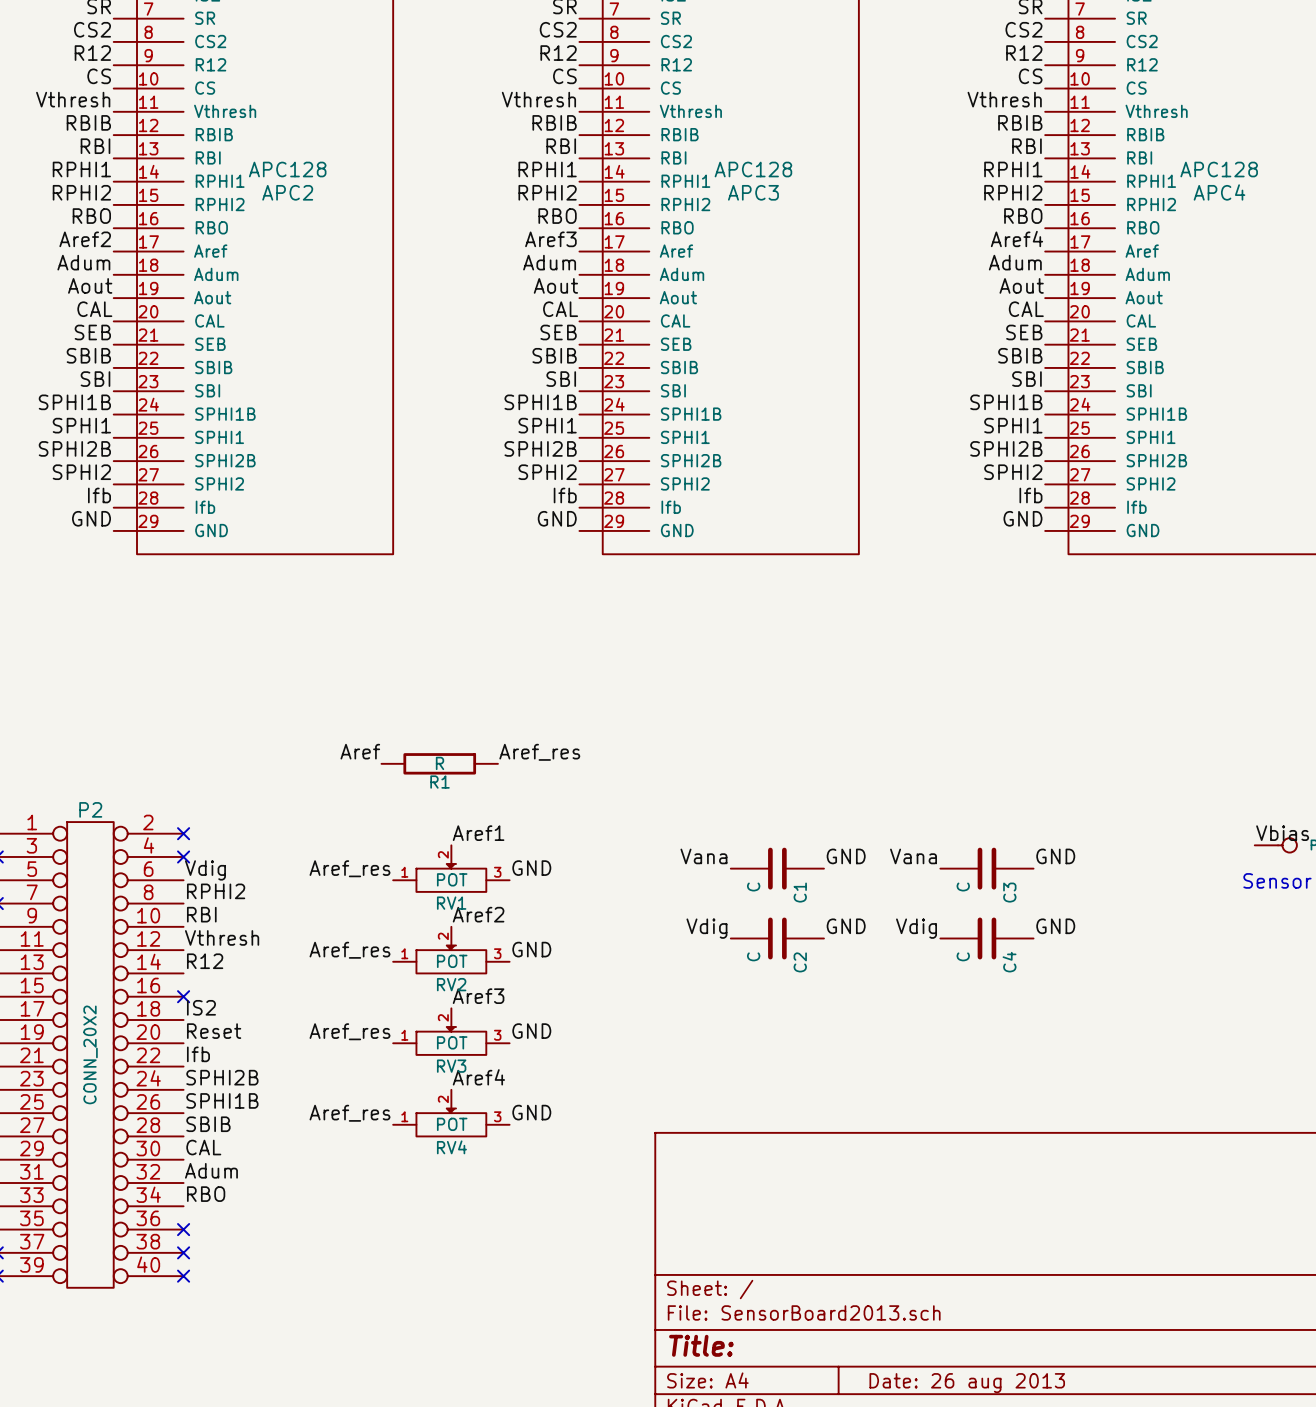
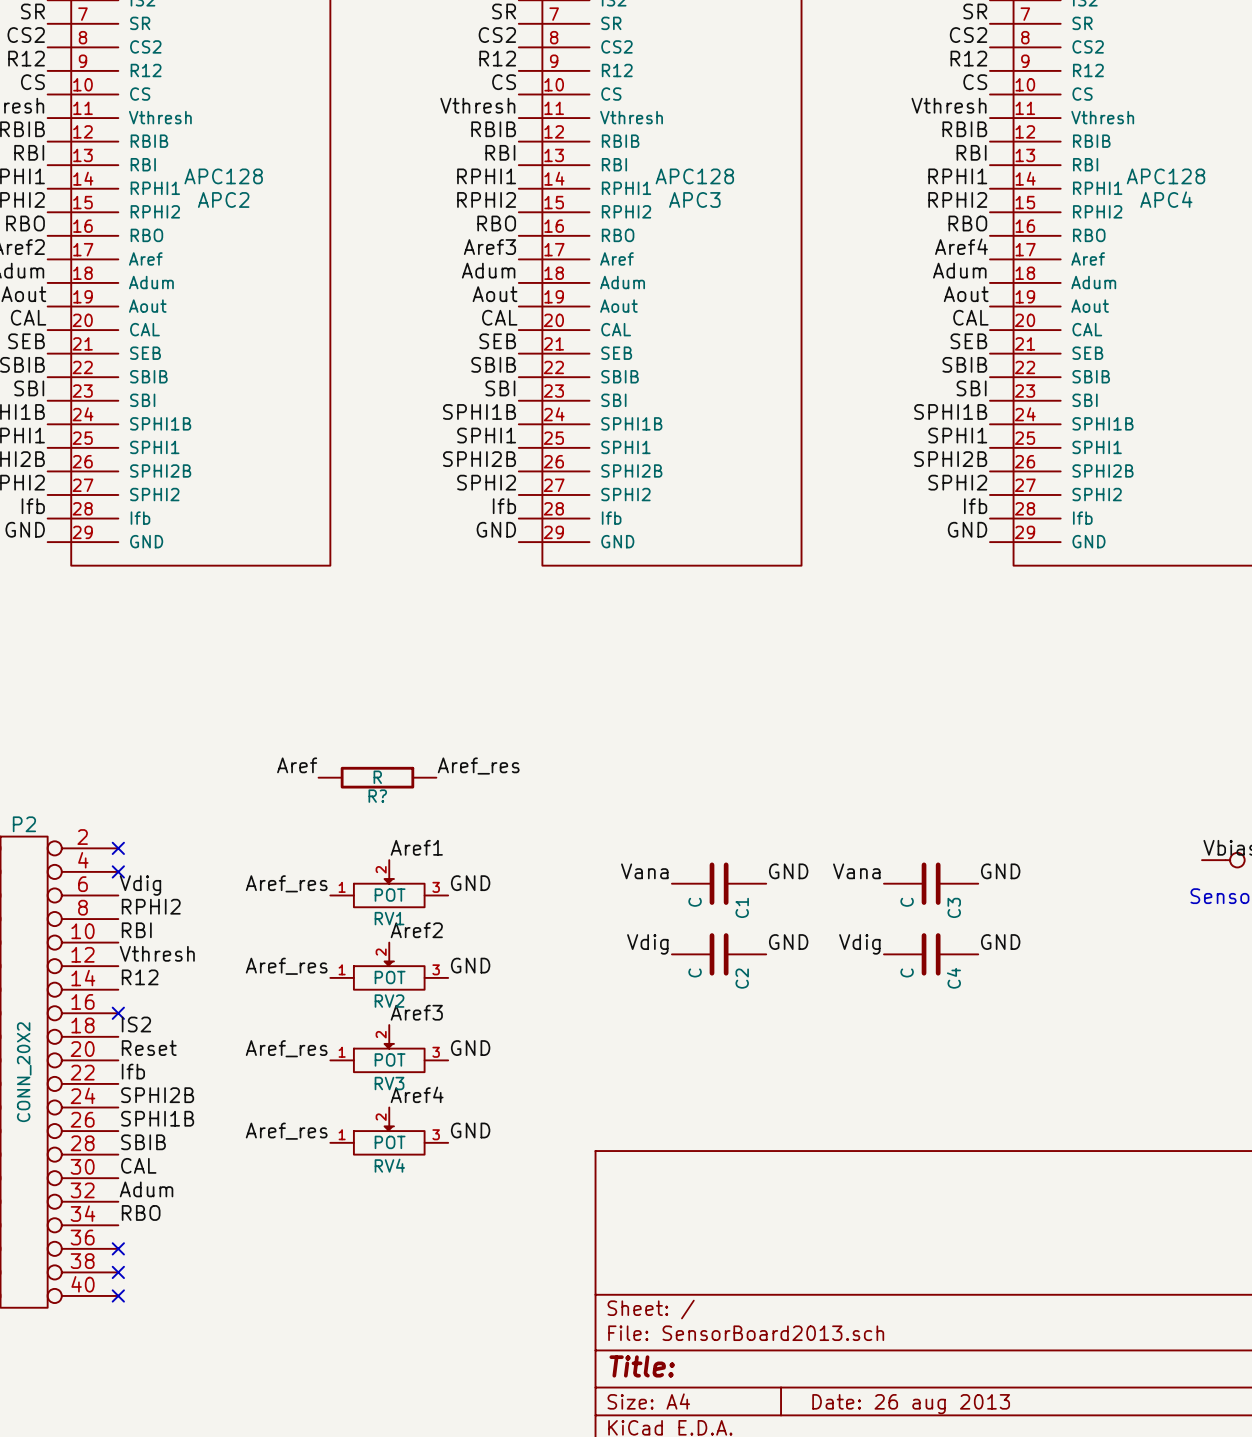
R1 name: R1 (440, 782) -> R? (377, 796)

